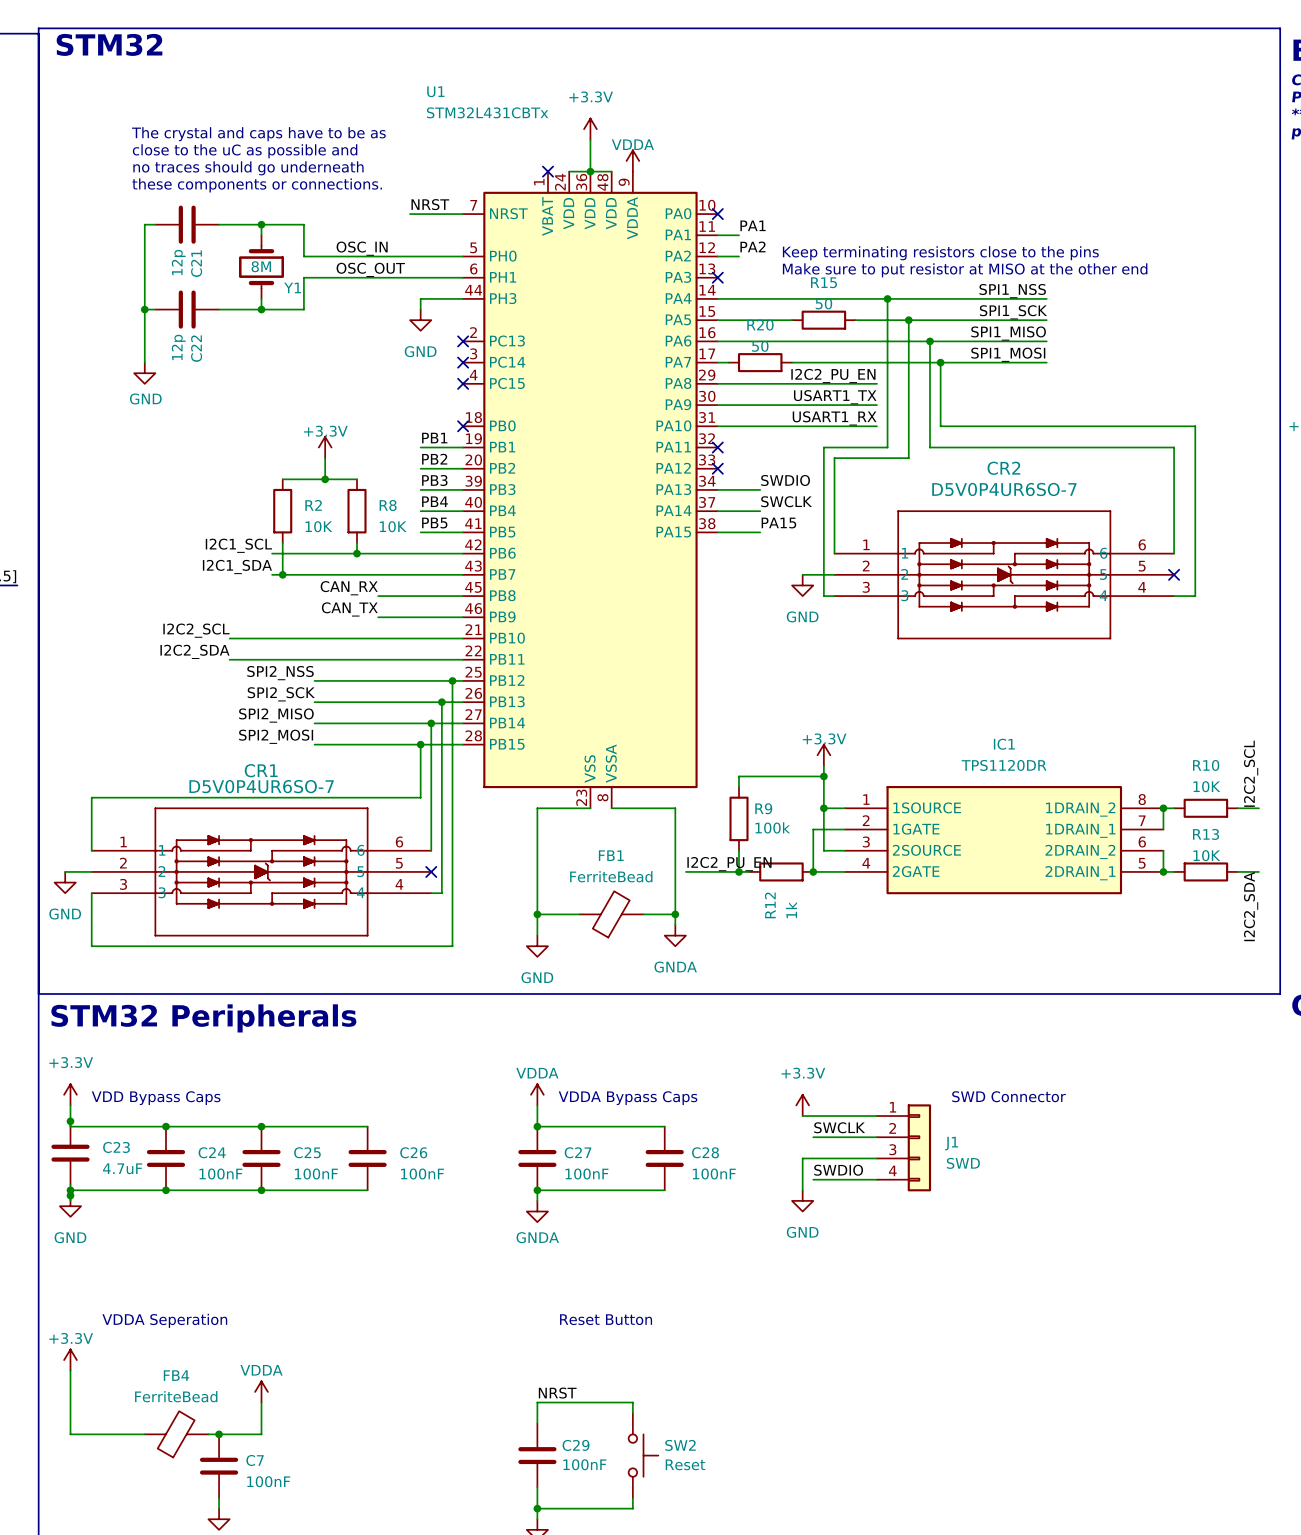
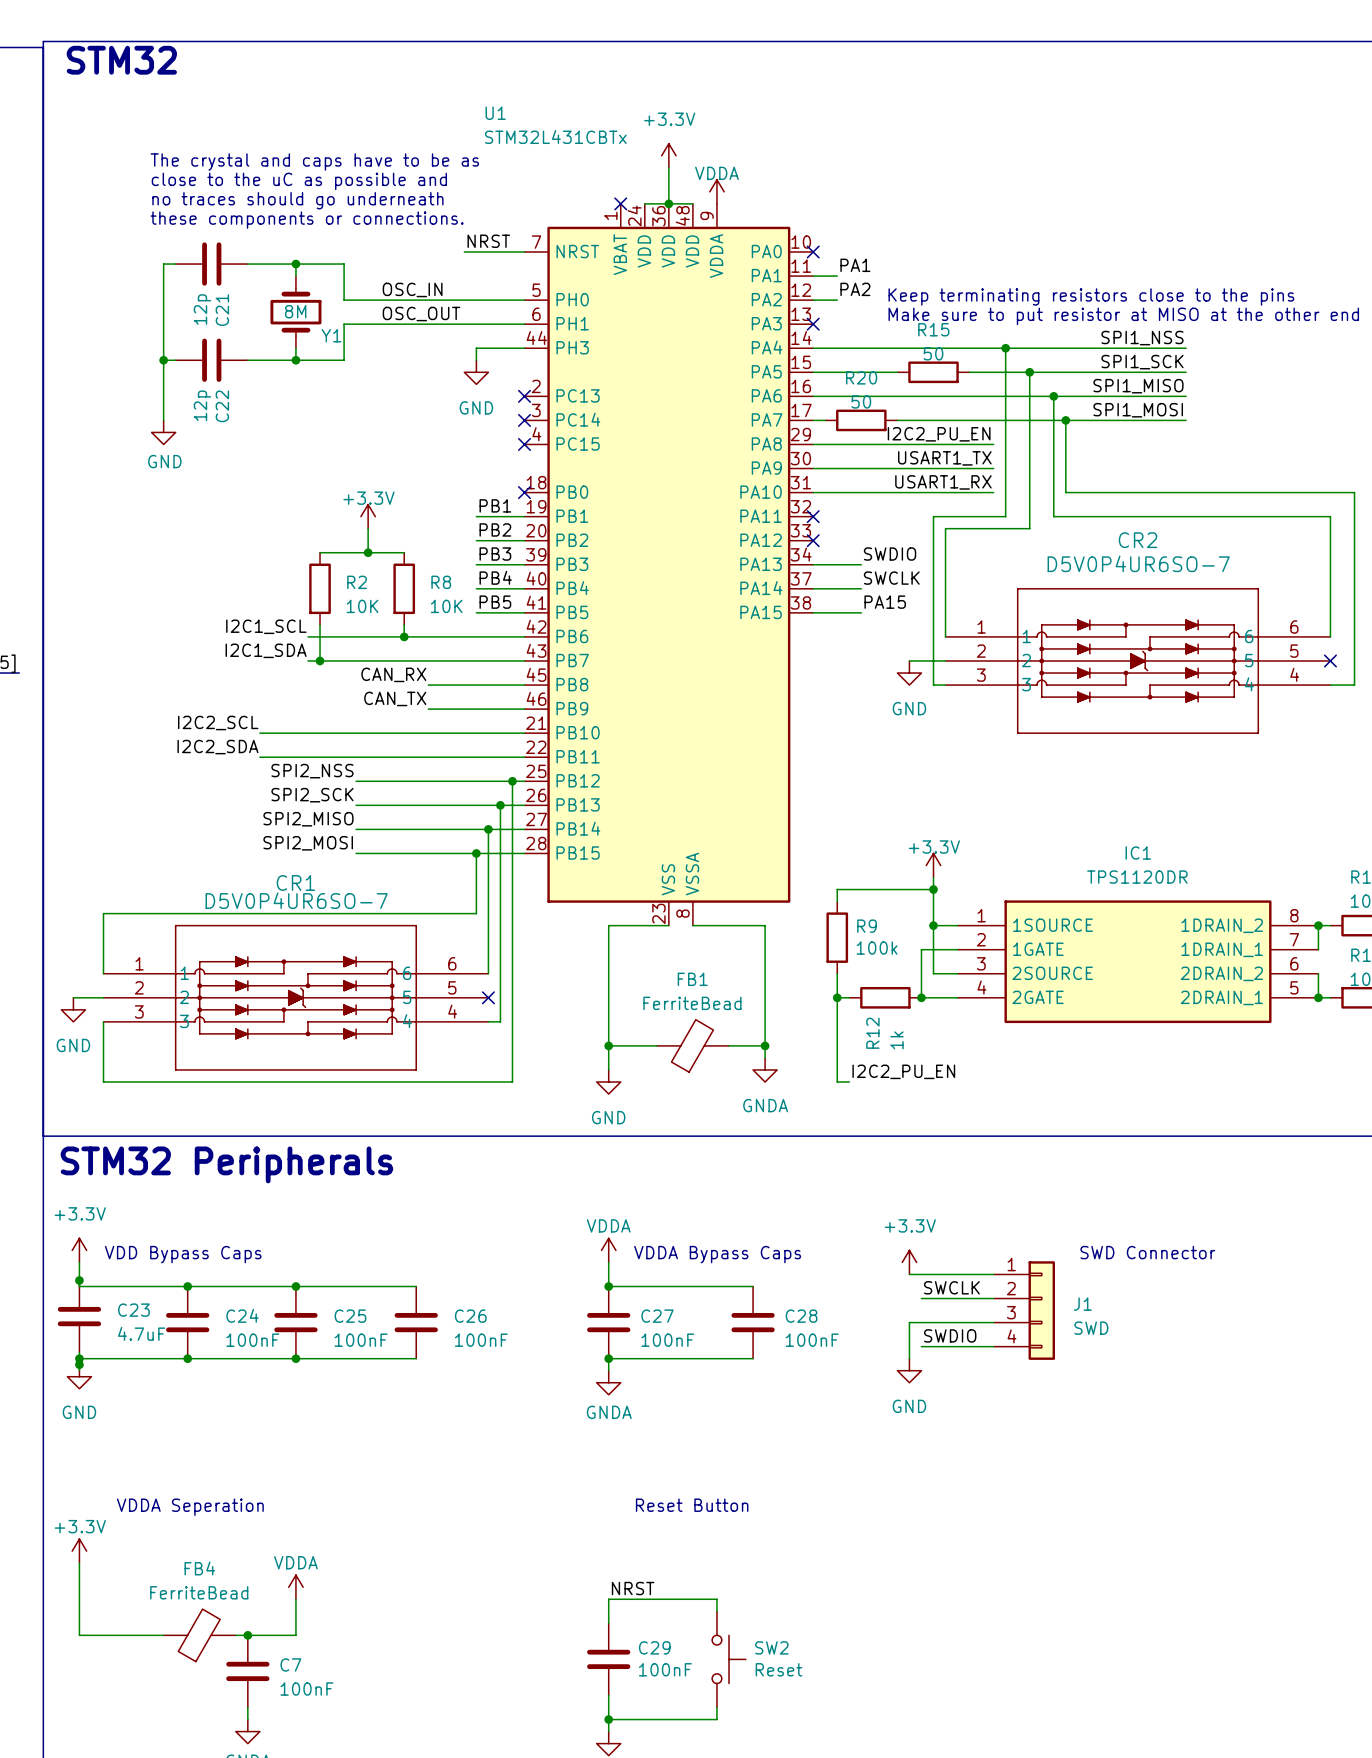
label position: I2C2_PU_EN (729, 864) -> I2C2_PU_EN (903, 1071)
wire: (685, 871) (739, 871) -> (849, 1082) (837, 1082) (837, 997)

